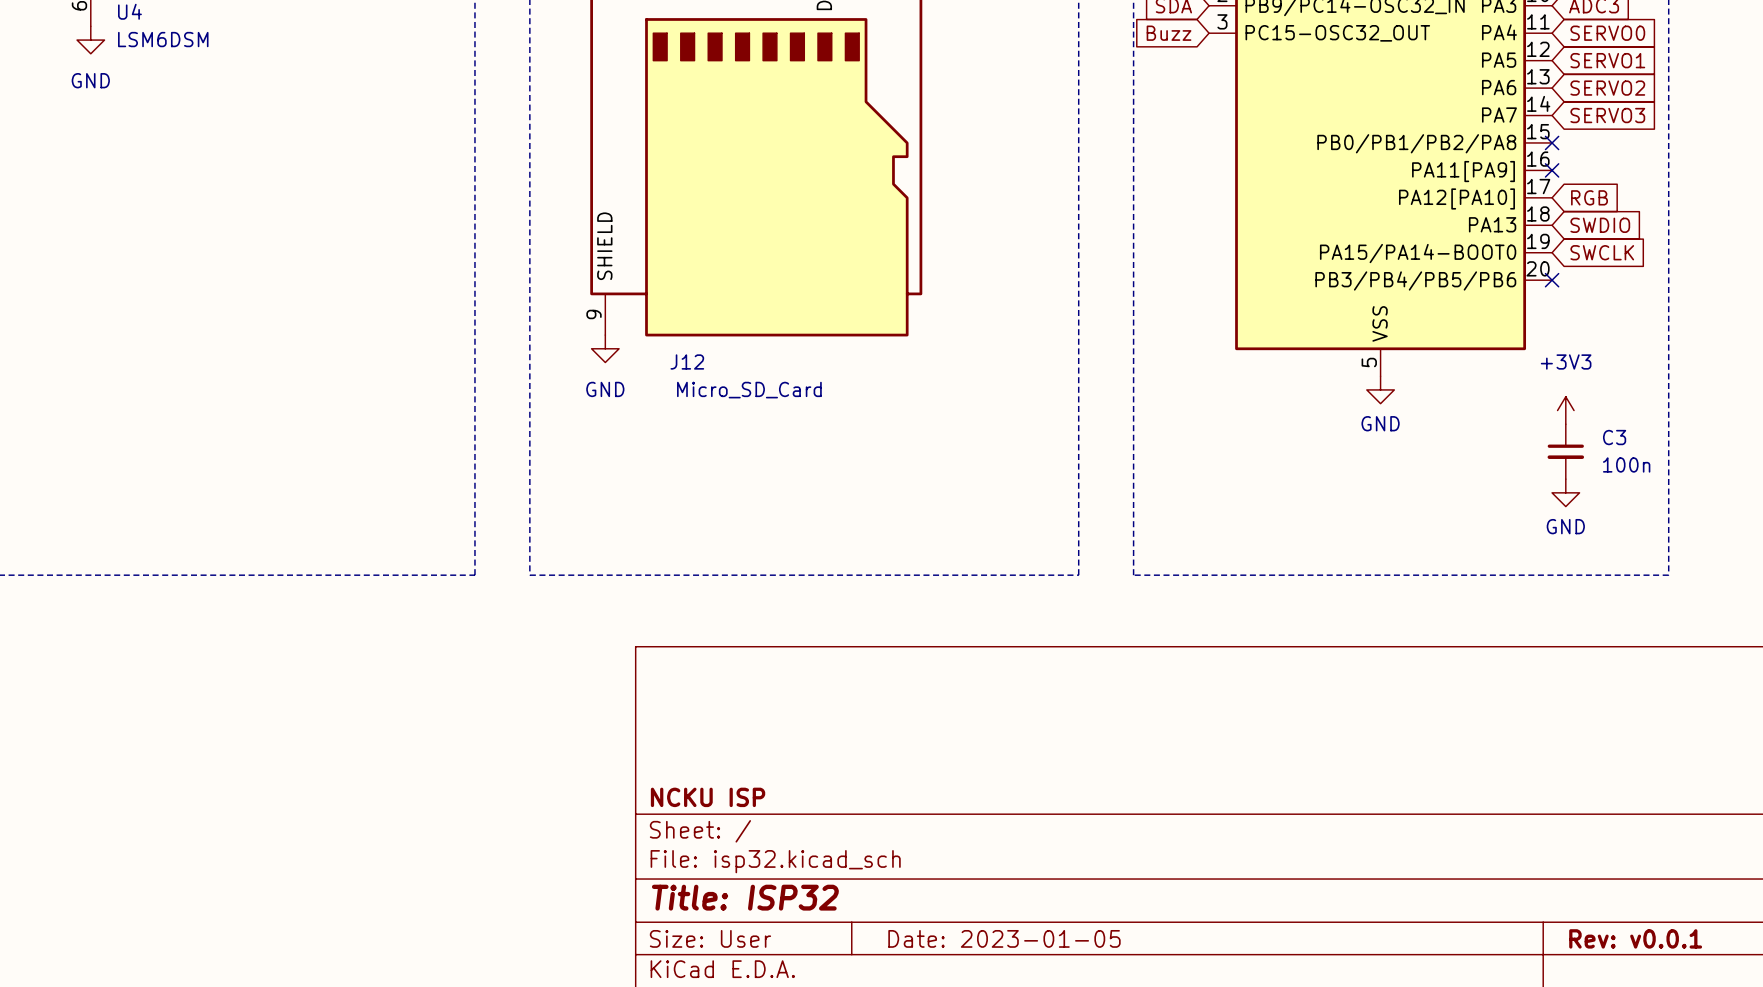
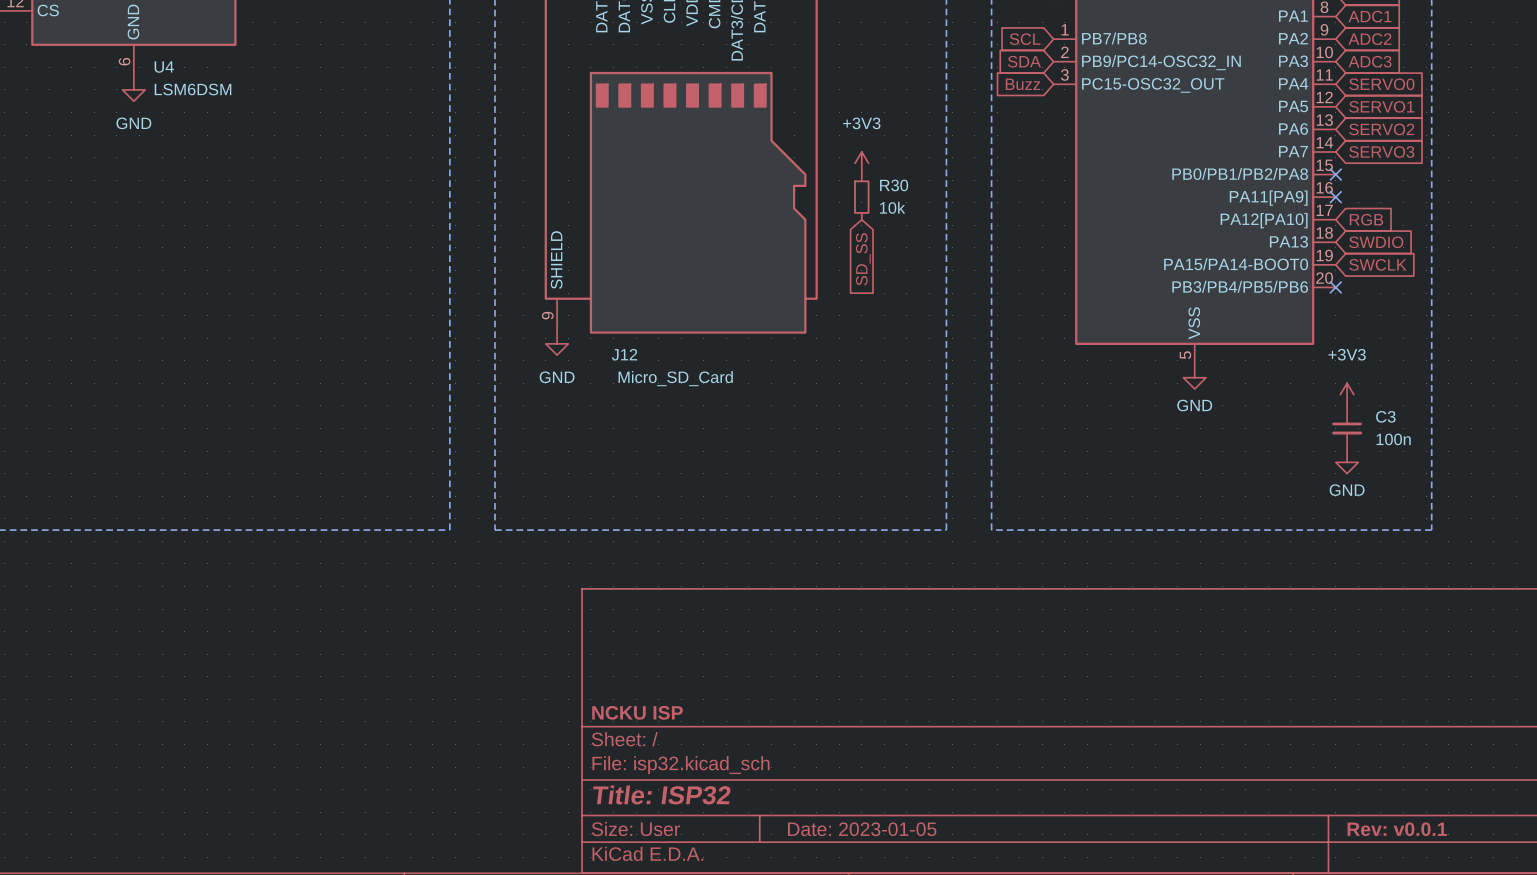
power symbol: none -> +3V3 (861, 163)
R30: none -> 10k (861, 197)
global label: none -> SD_SS (863, 259)

